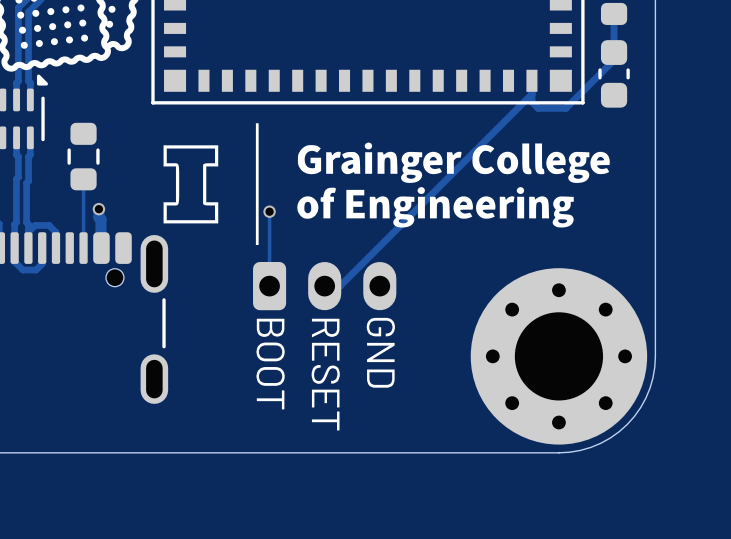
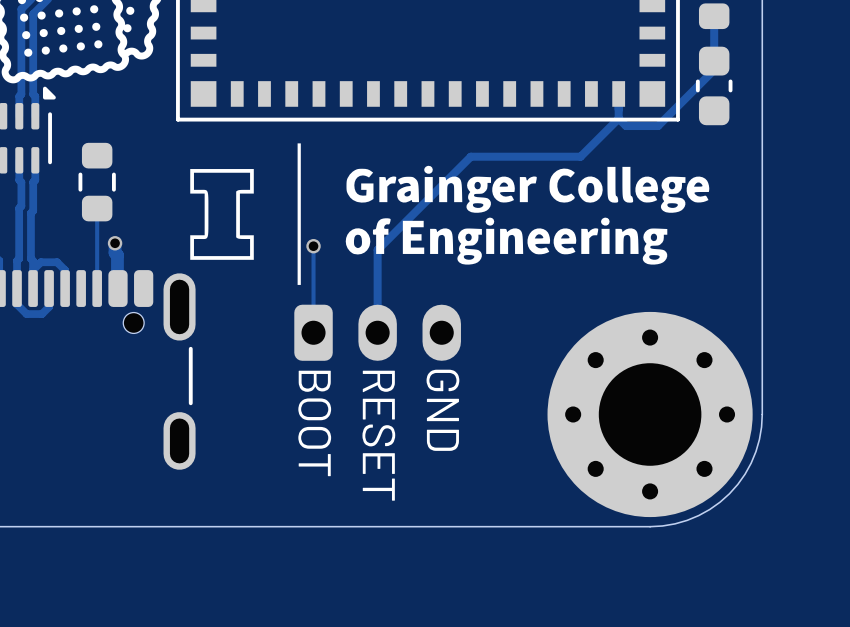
track: (531, 94) (340, 286) (324, 286) -> (618, 118) (580, 156) (470, 156) (377, 249) (377, 332)

